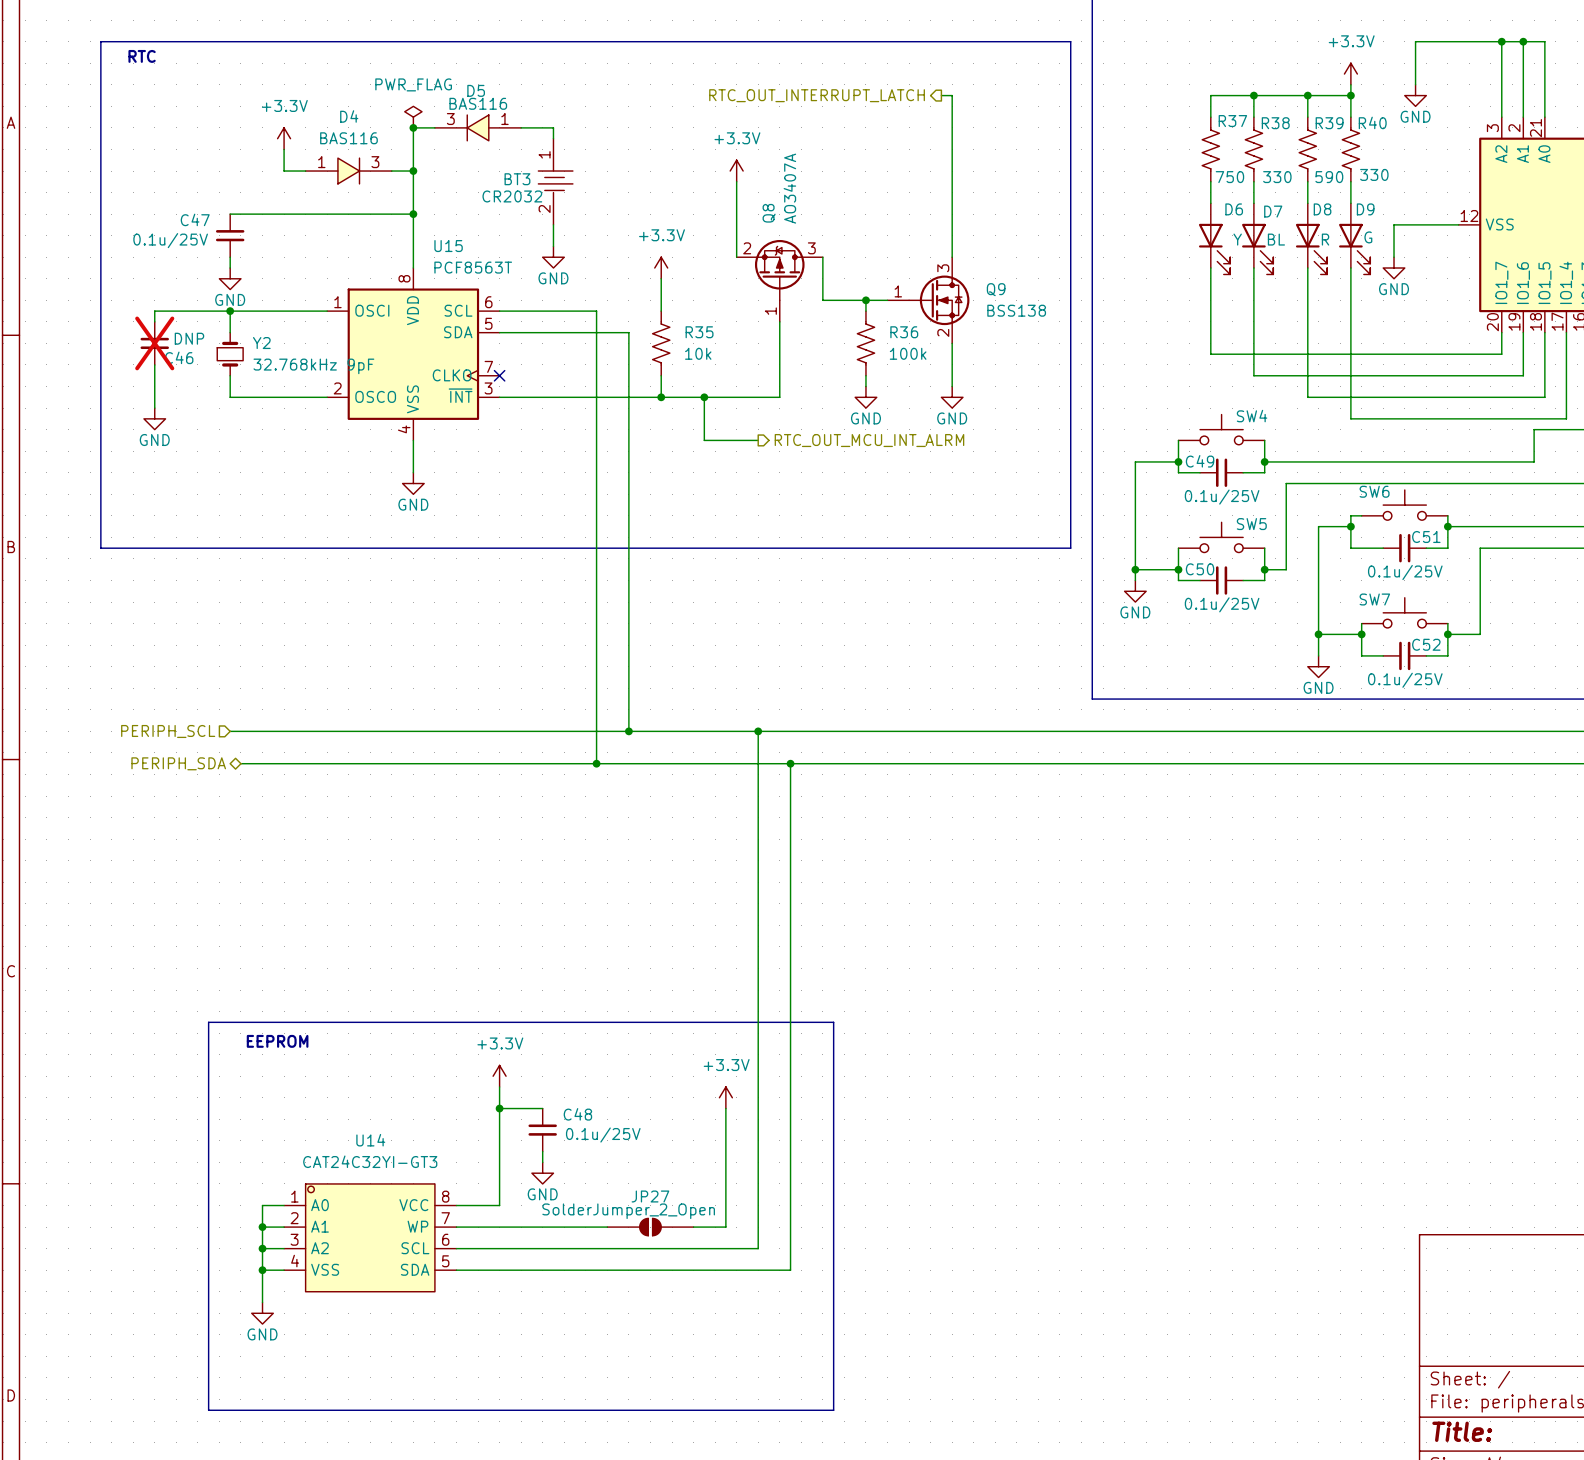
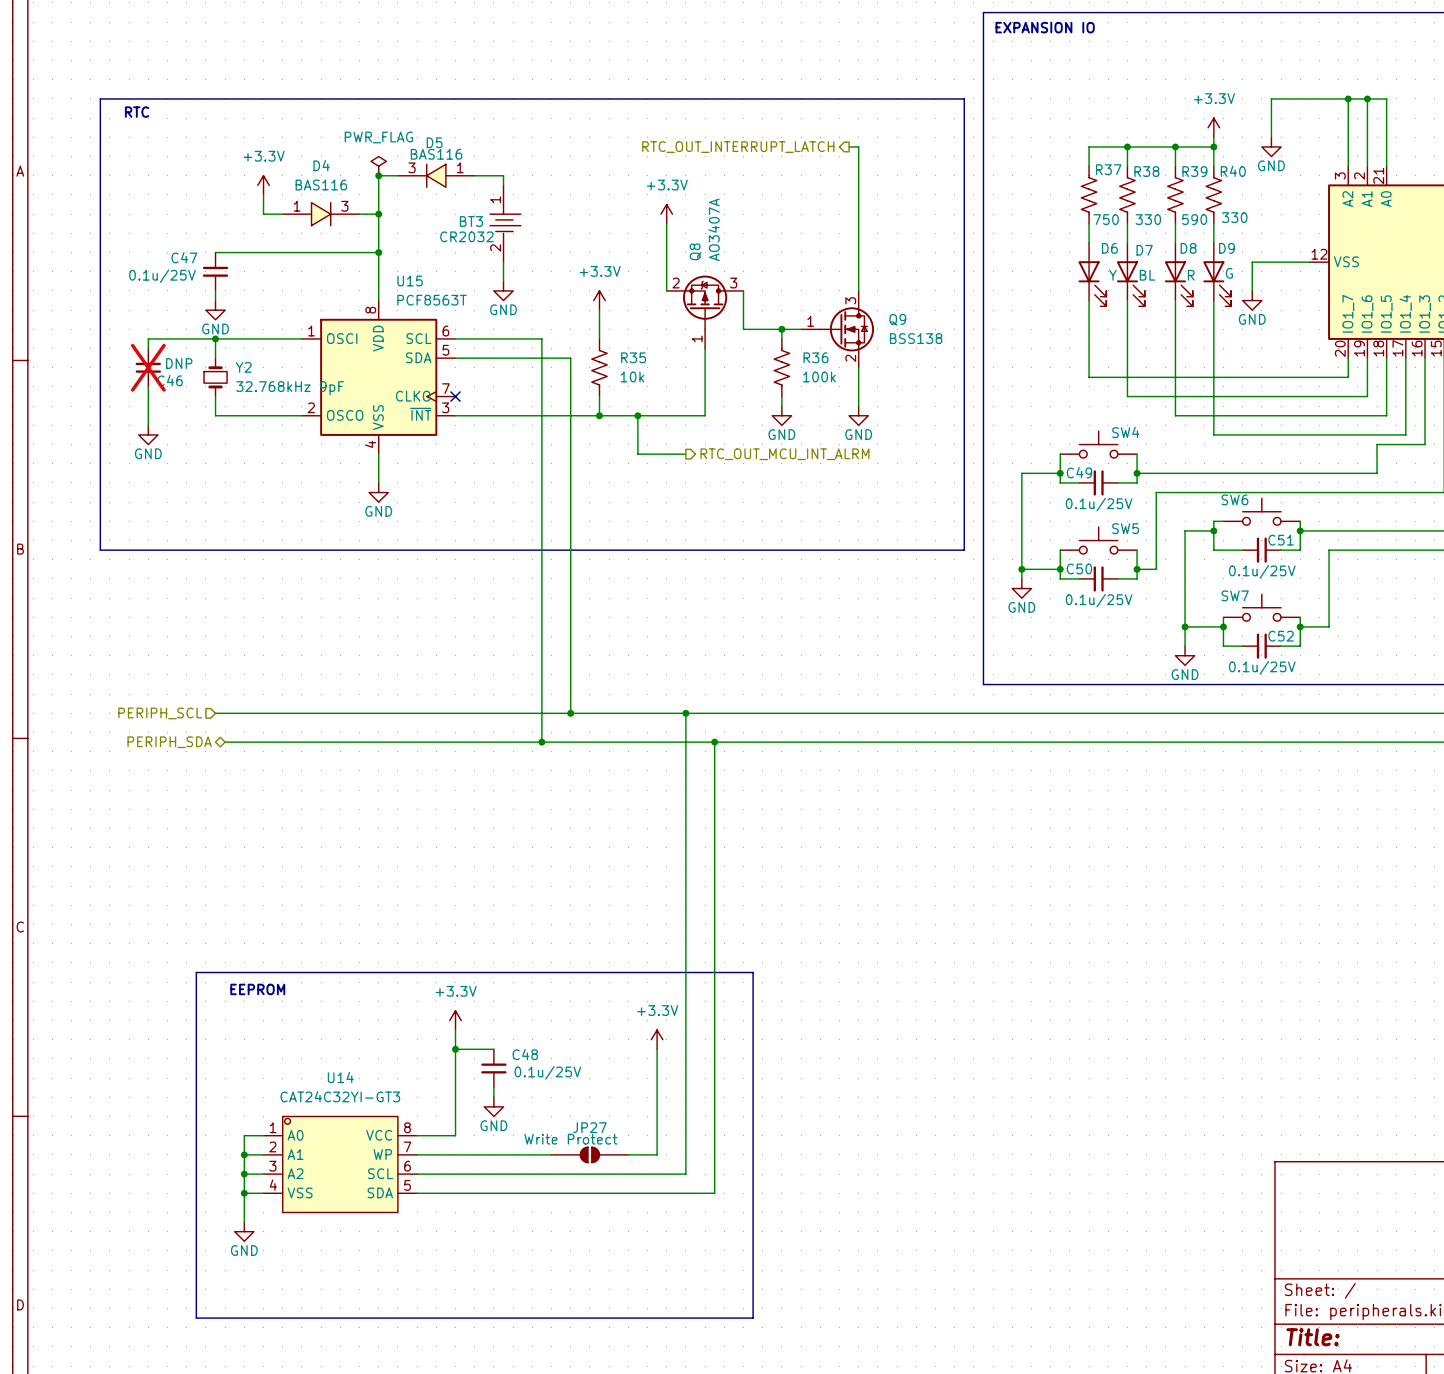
JP27 value: SolderJumper_2_Open (628, 1211) -> Write Protect (570, 1139)

